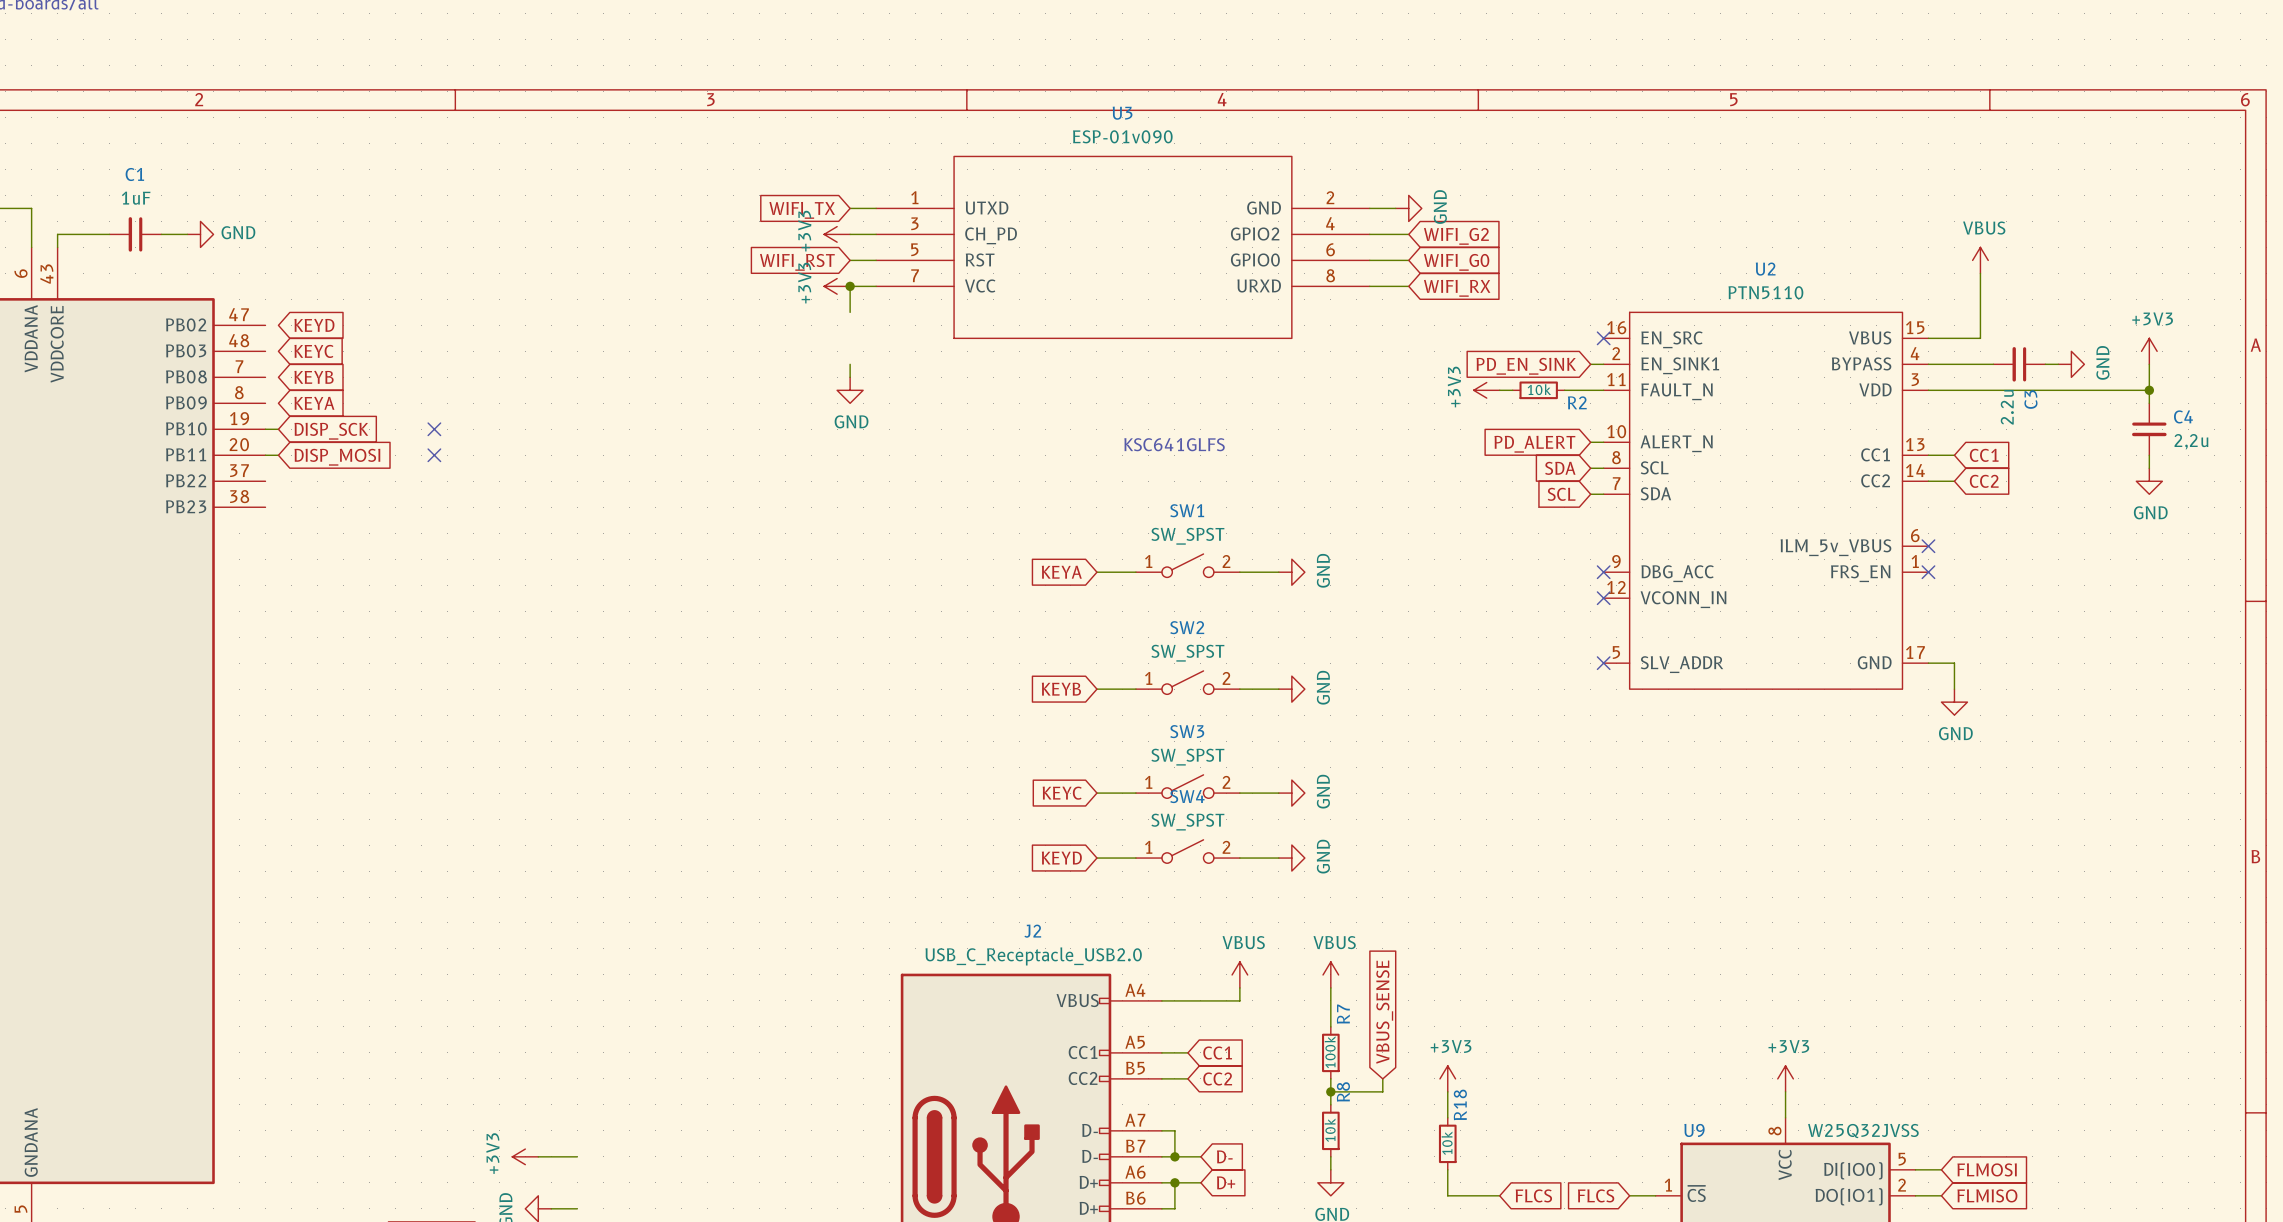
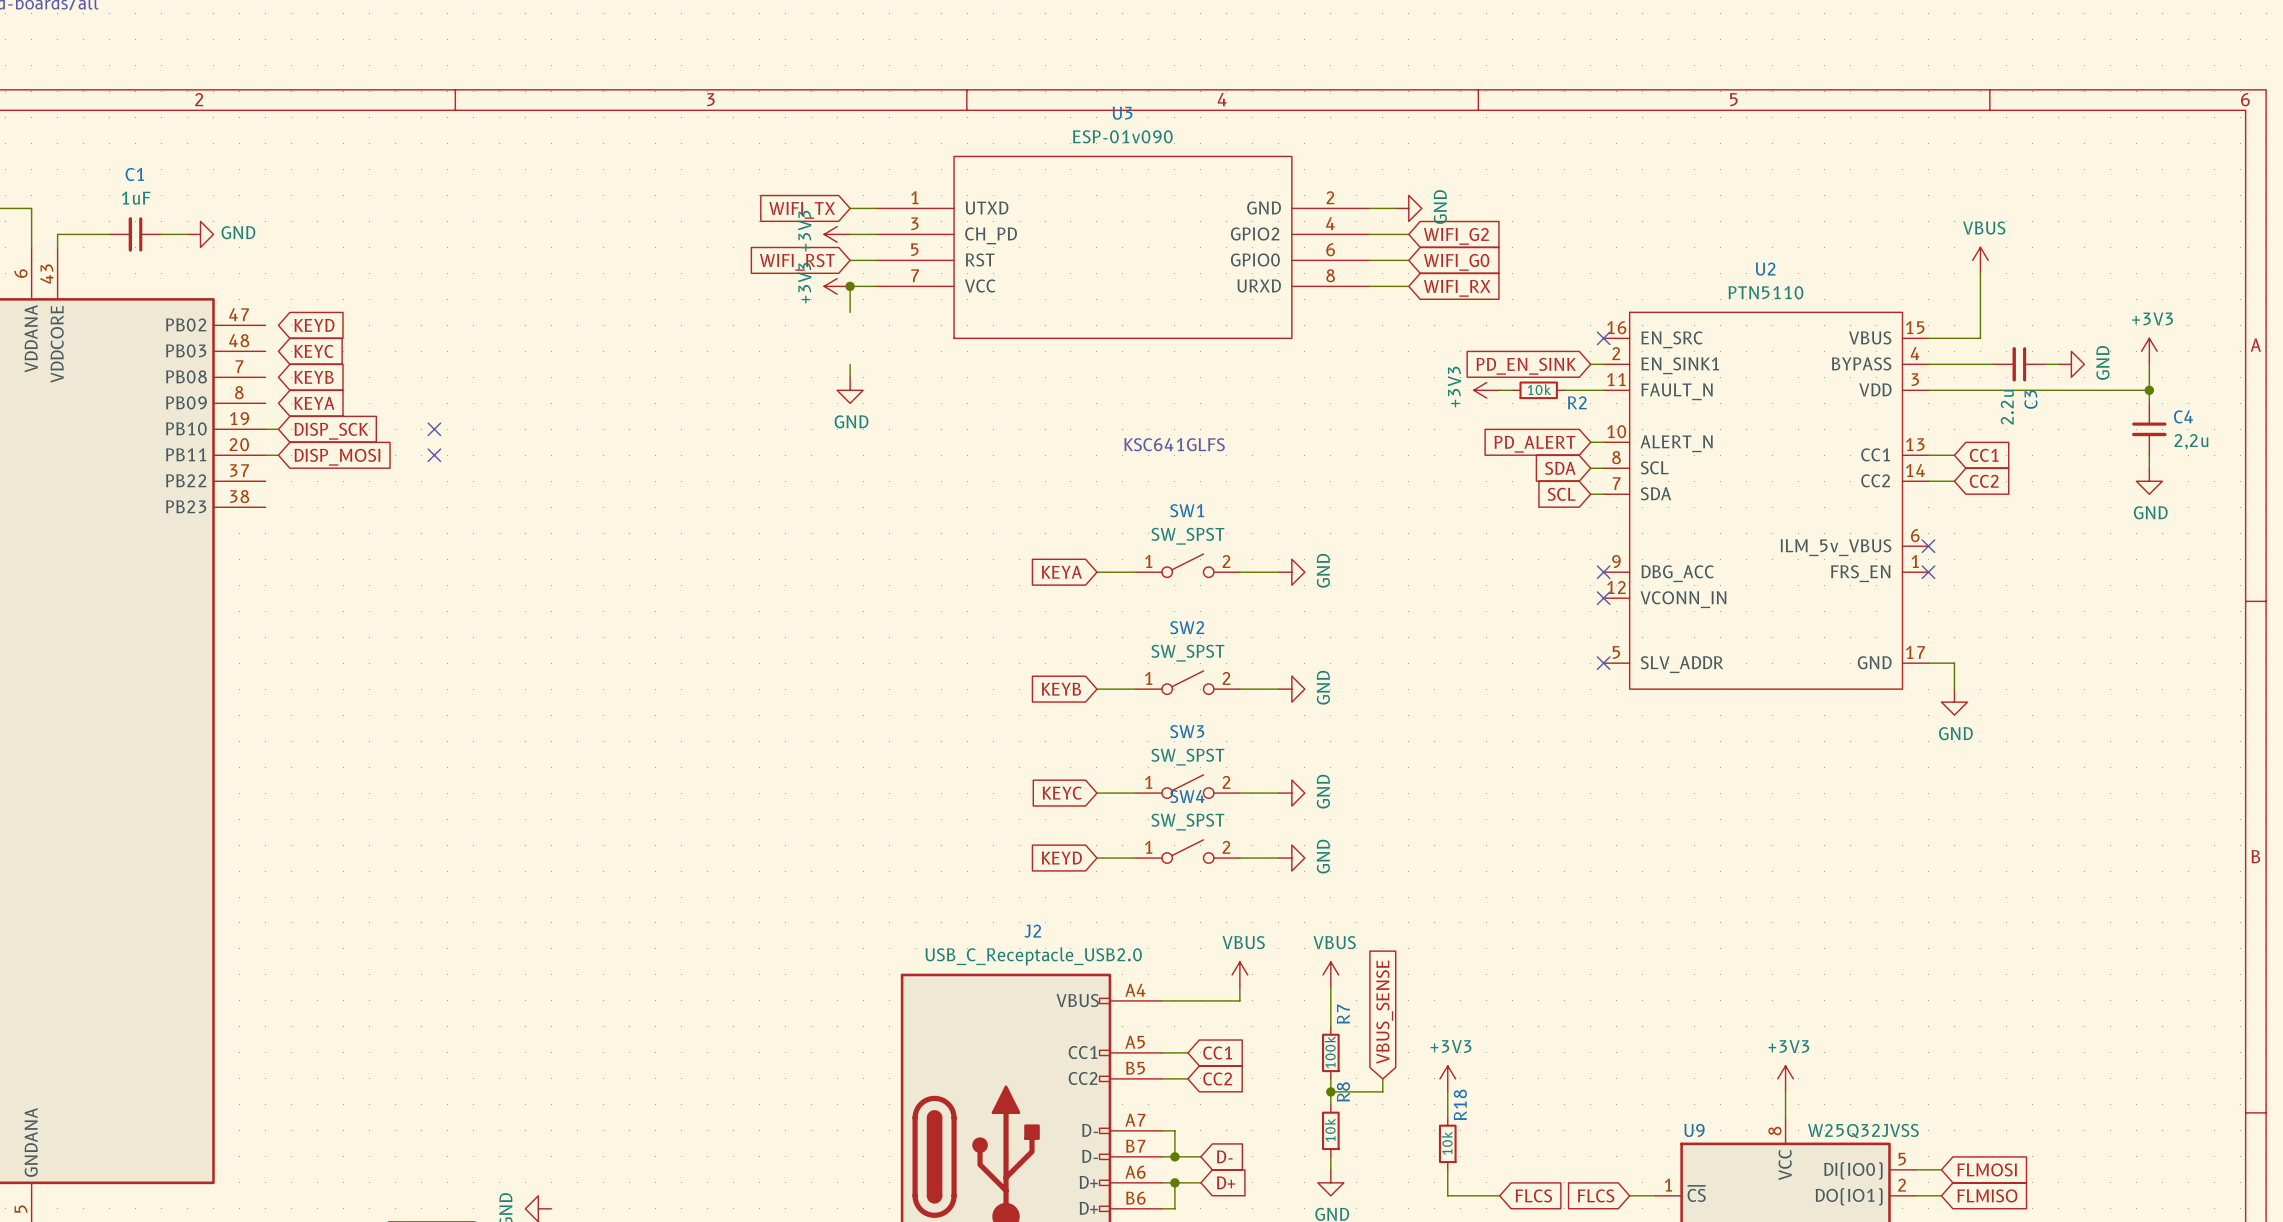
power symbol: +3V3 (525, 1156) -> none
wire: (538, 1156) (577, 1156) -> none
wire: (551, 1208) (577, 1208) -> none

